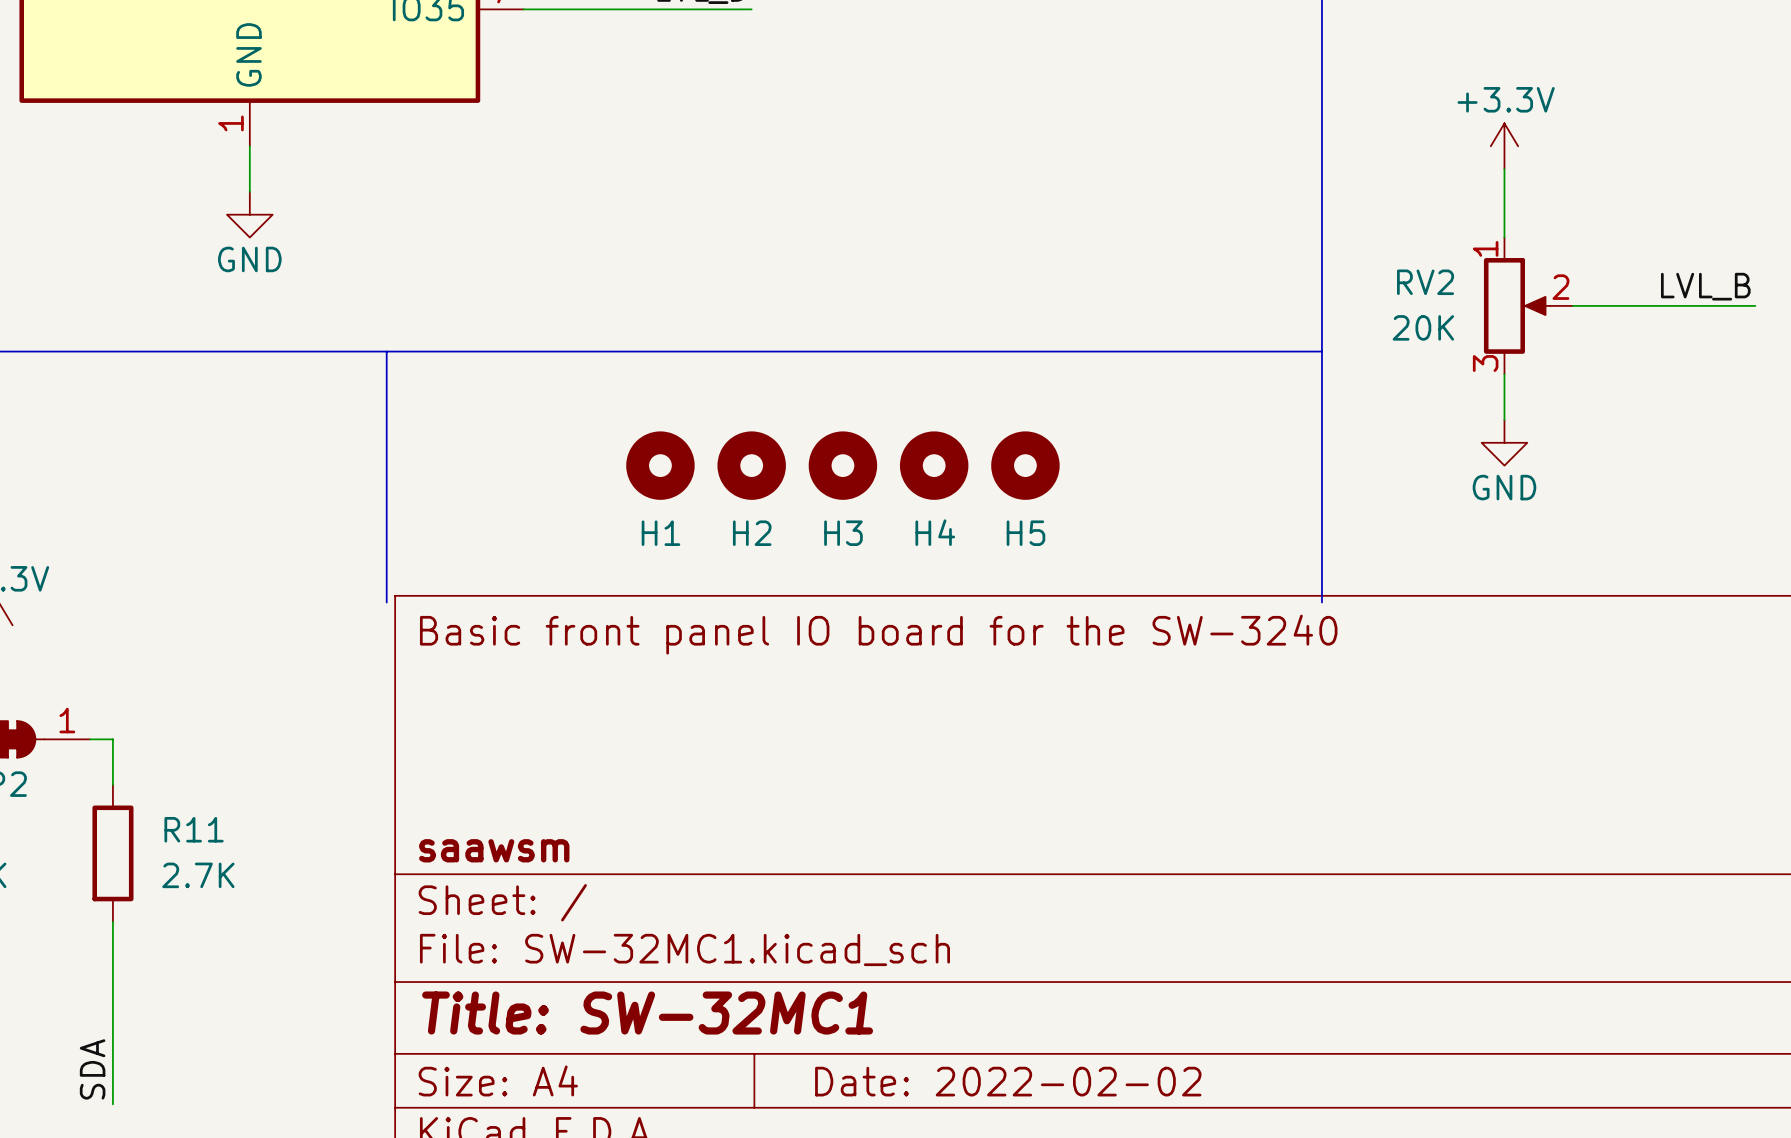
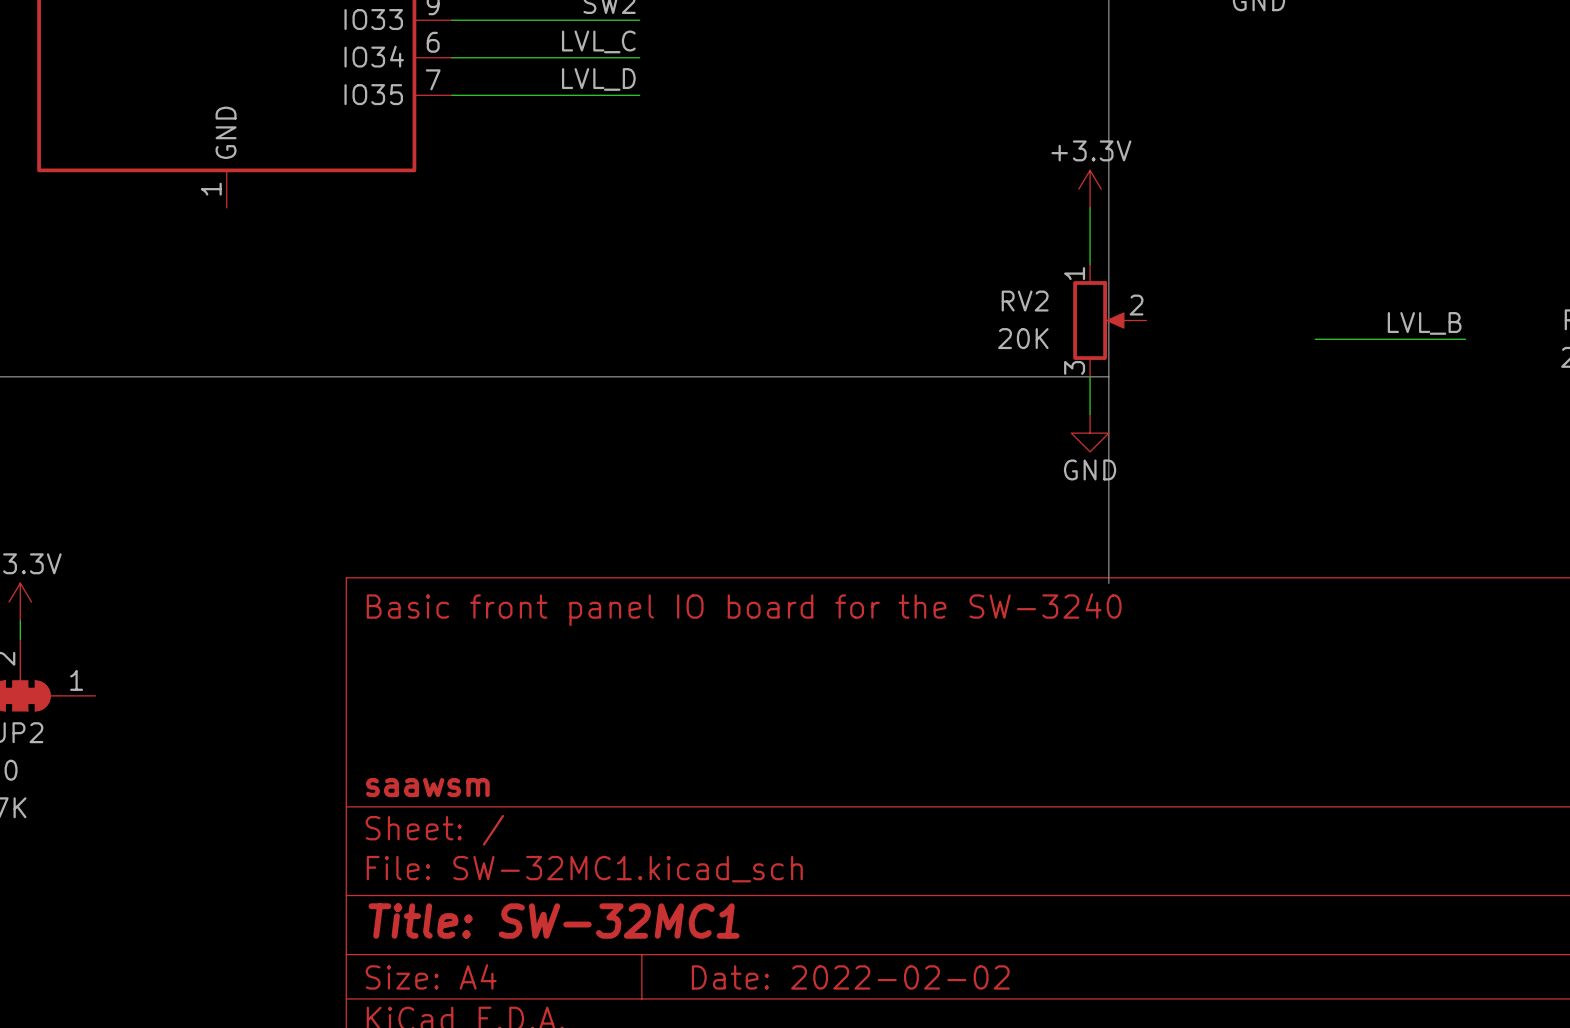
wire: (249, 146) (249, 191) -> none
power symbol position: +3.3V (1504, 146) -> +3.3V (1090, 189)
wire: (1504, 169) (1504, 237) -> (1090, 207) (1090, 264)
power symbol: GND (249, 214) -> none
RV2 position: (1528, 305) -> (1109, 320)
line: (386, 351) (386, 602) -> none
wire: (1504, 374) (1504, 419) -> (1090, 376) (1090, 414)
power symbol position: GND (1504, 442) -> GND (1090, 433)
H1: (660, 465) -> none
H2: (751, 465) -> none
H3: (842, 465) -> none
H4: (934, 465) -> none
H5: (1025, 465) -> none
wire: (90, 739) (112, 739) (112, 784) -> none
R11: 2.7K (112, 853) -> none
wire: (112, 921) (112, 1104) -> none
label: SDA (92, 1069) -> none

